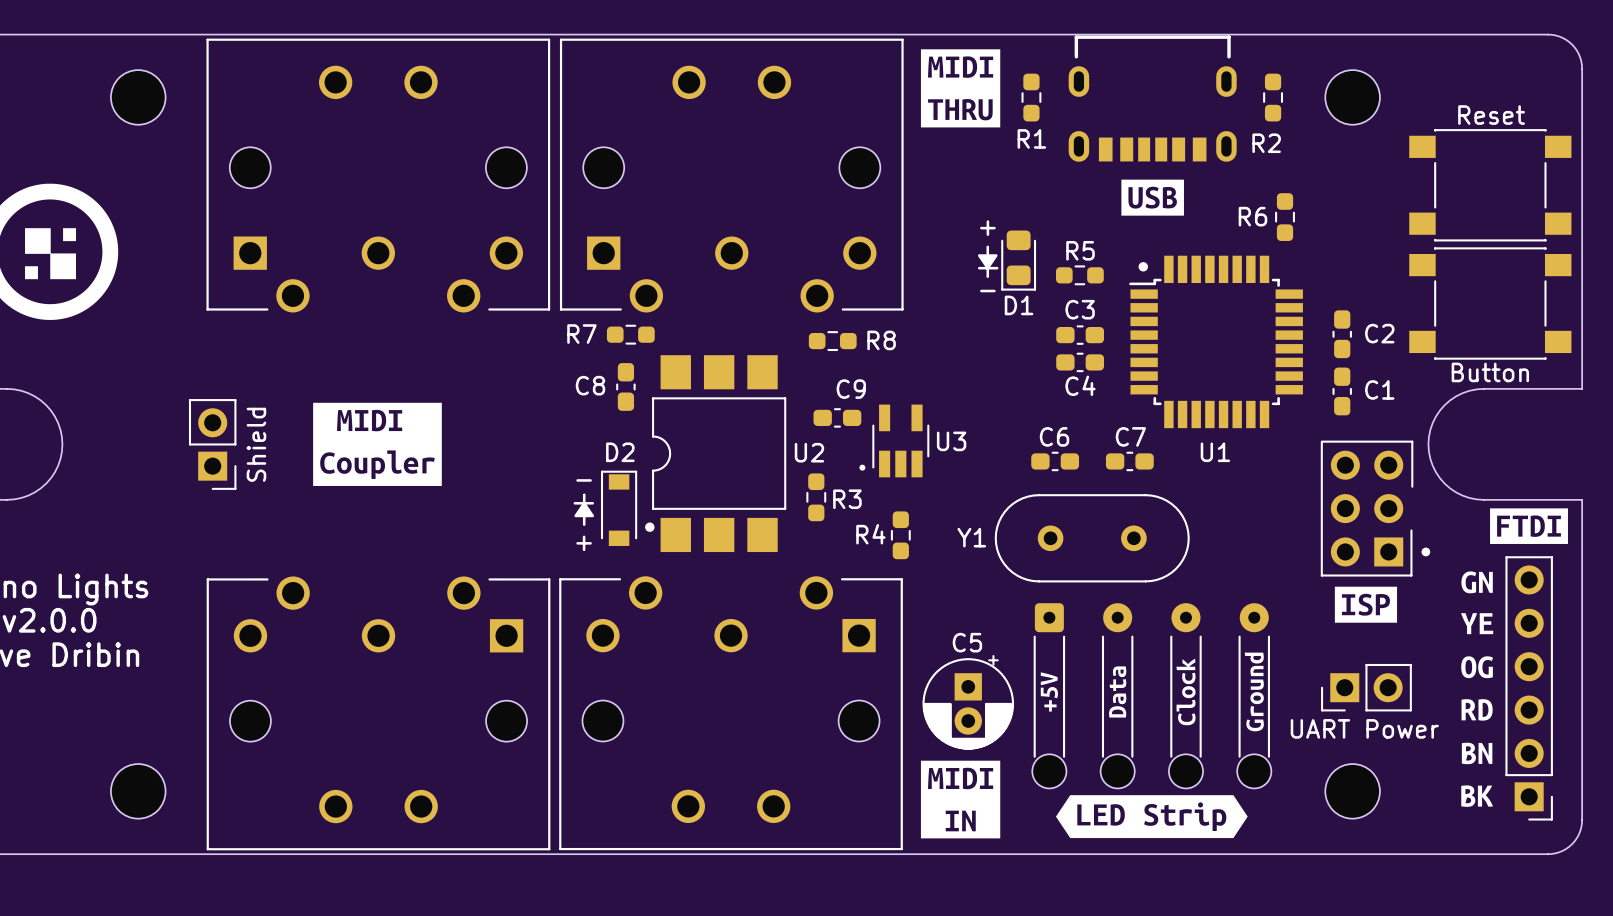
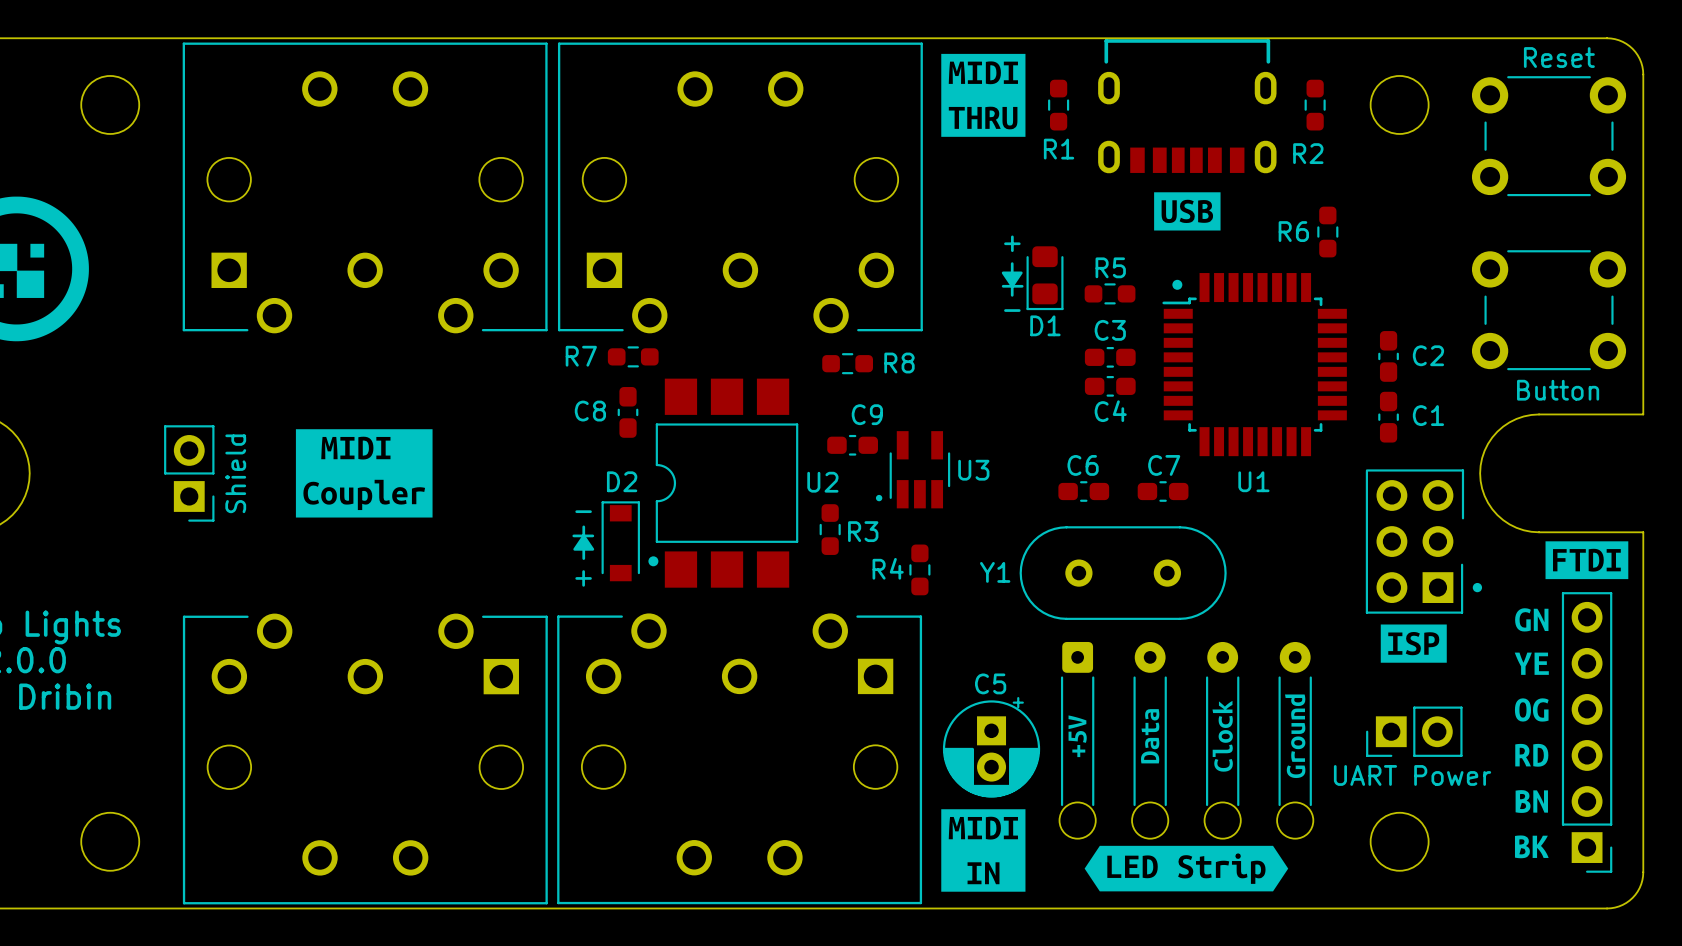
part: none -> Reset (1549, 136)
part: Reset (1490, 185) -> none
part footprint: [1409, 247, 1572, 360] -> [1471, 250, 1627, 371]

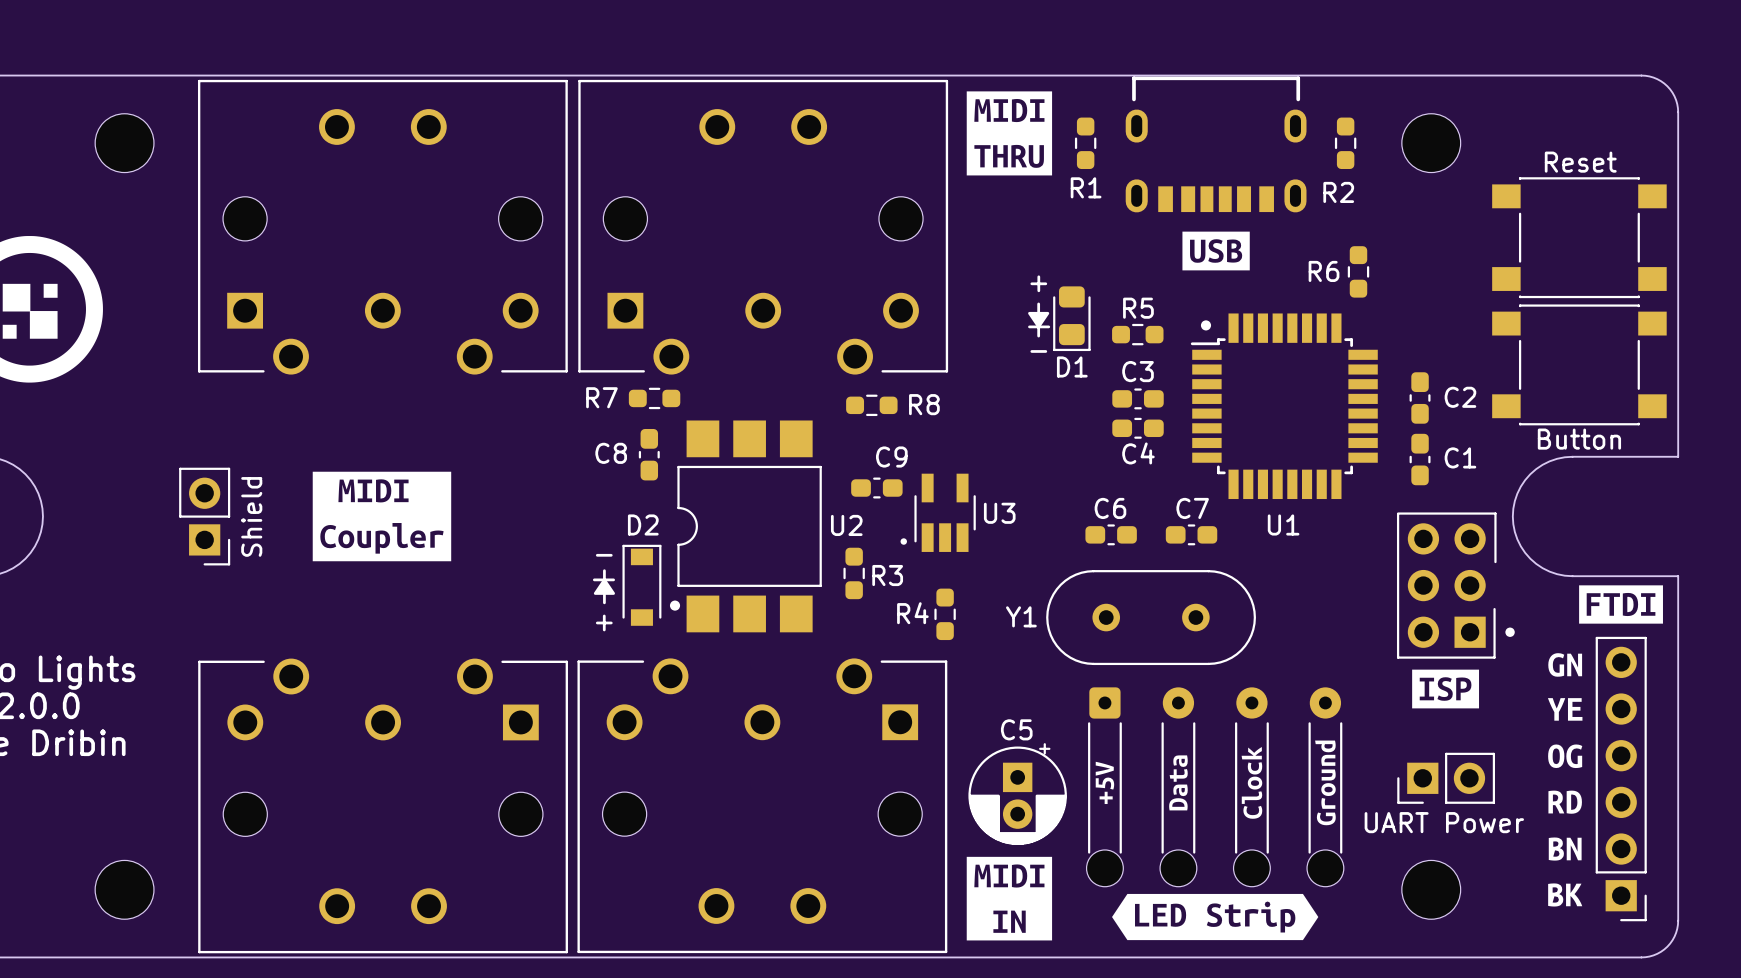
part: Reset (1549, 136) -> none
part: none -> Reset (1579, 237)
part footprint: [1471, 250, 1627, 371] -> [1492, 304, 1667, 426]

